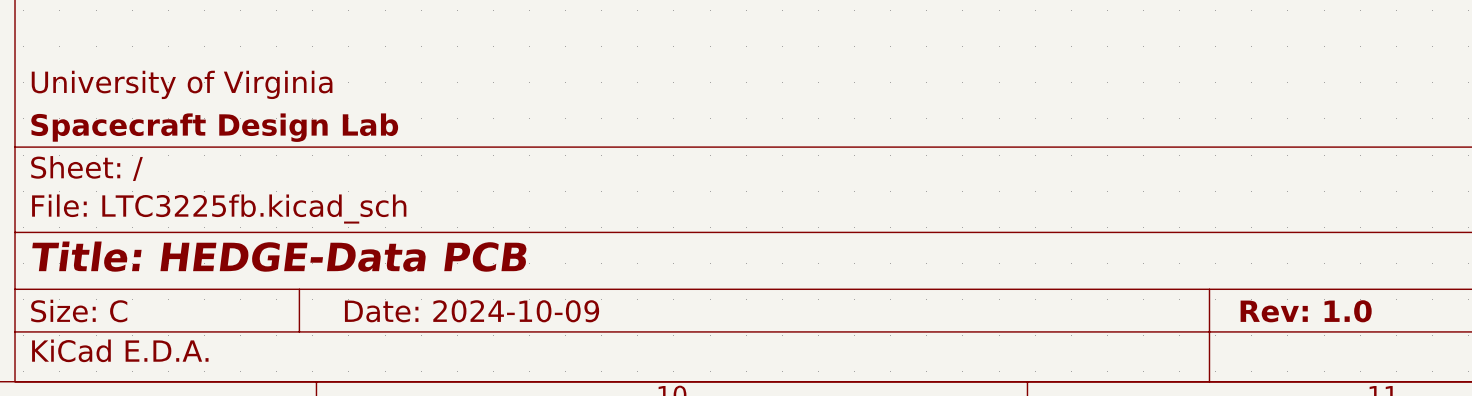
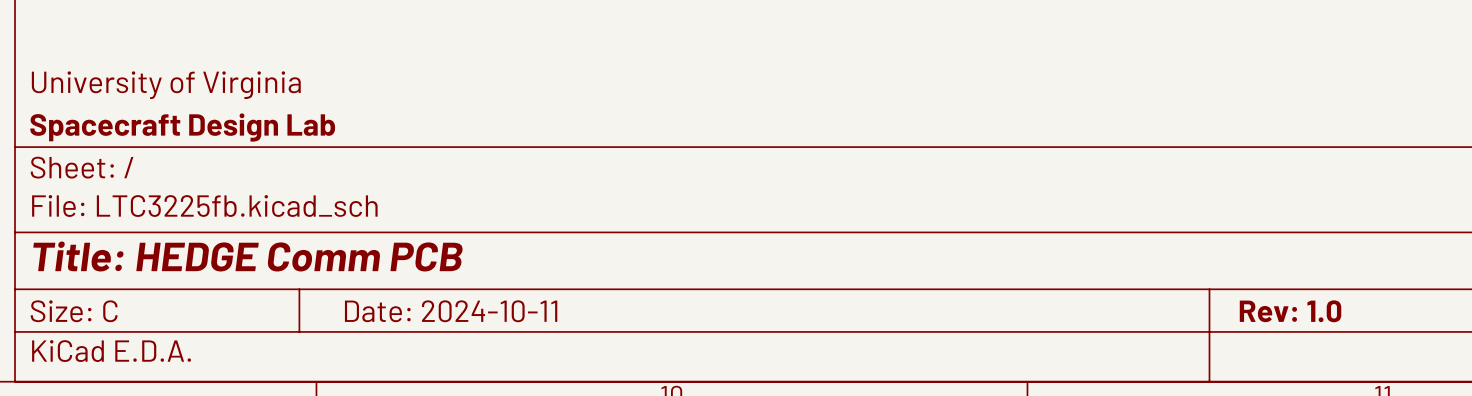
title block: Title: HEDGE-Data PCB (279, 256) -> Title: HEDGE Comm PCB (248, 256)
title block: Date: 2024-10-09 (472, 311) -> Date: 2024-10-11 (451, 311)

